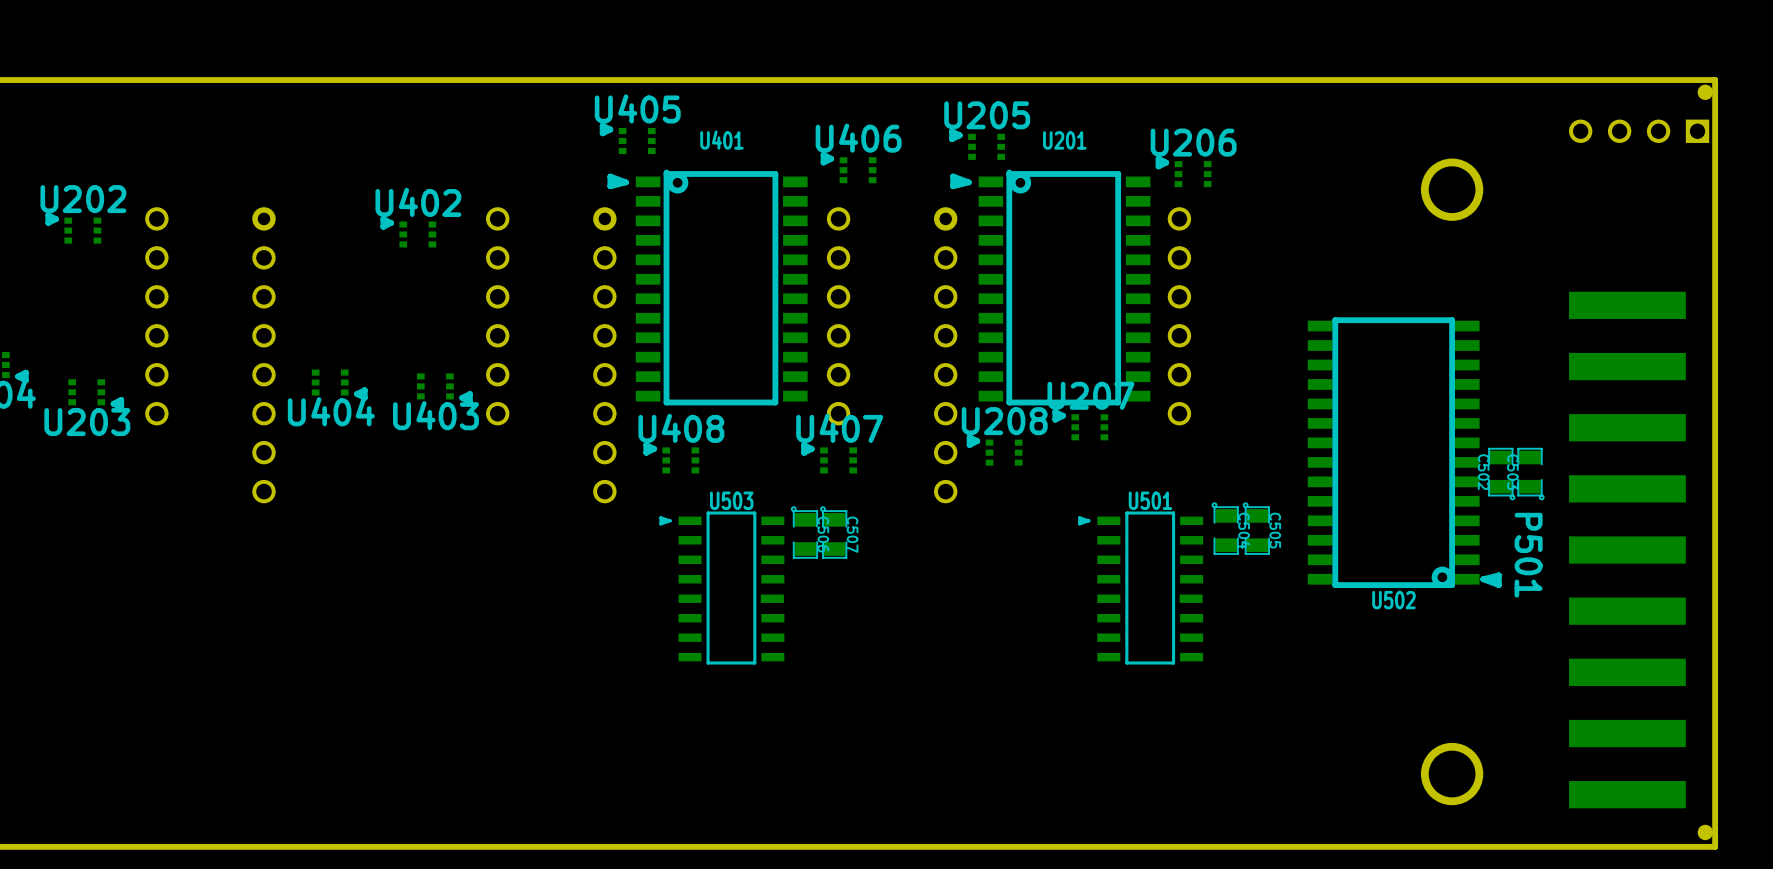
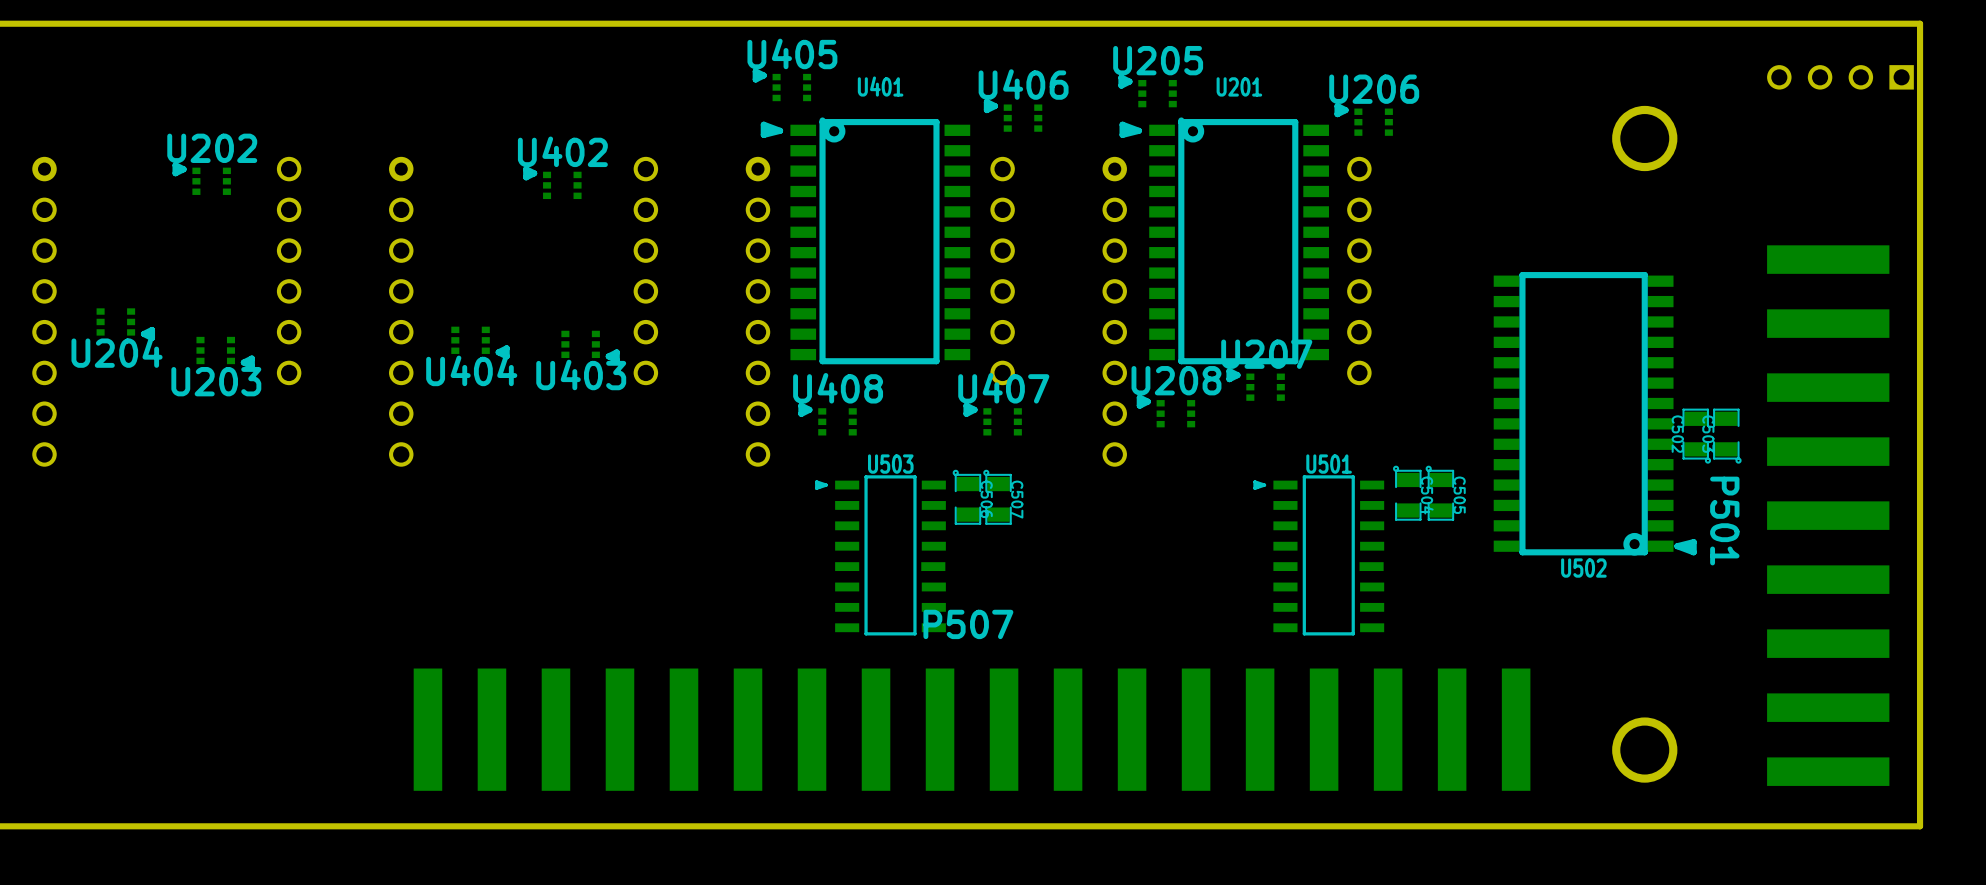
part: (1705, 92) -> none
P507: none -> (972, 729)
part: (1705, 832) -> none

